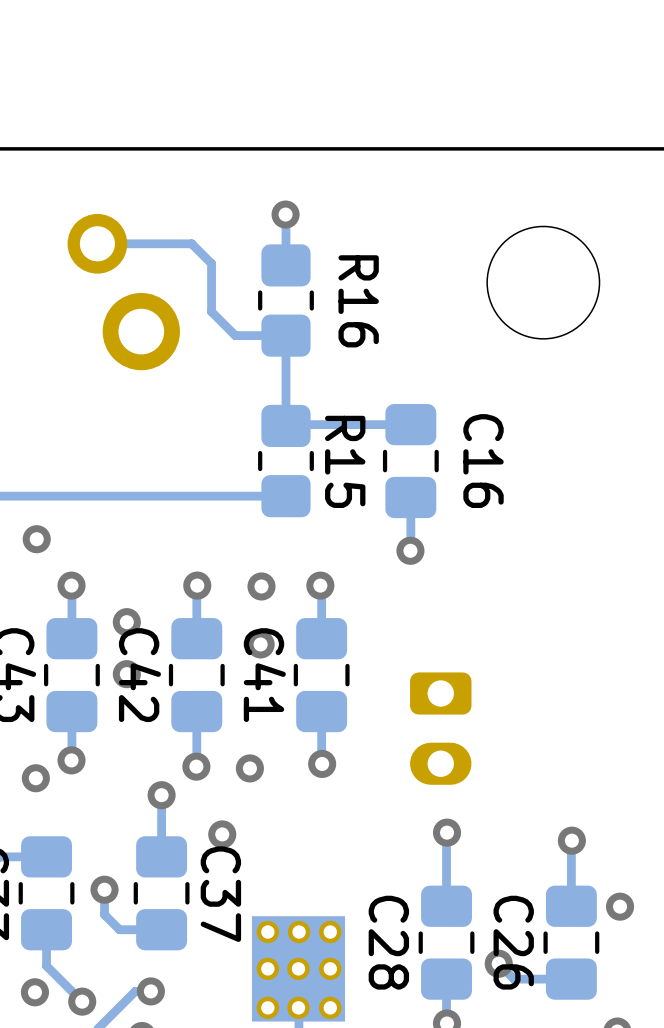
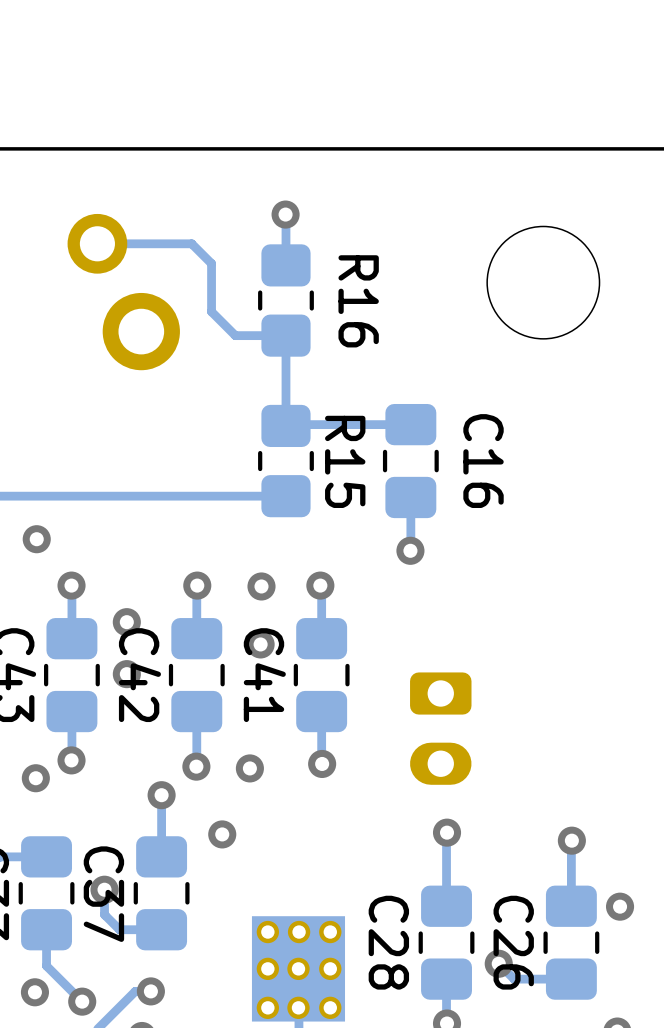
C37 name position: C37 (220, 894) -> C37 (103, 894)

